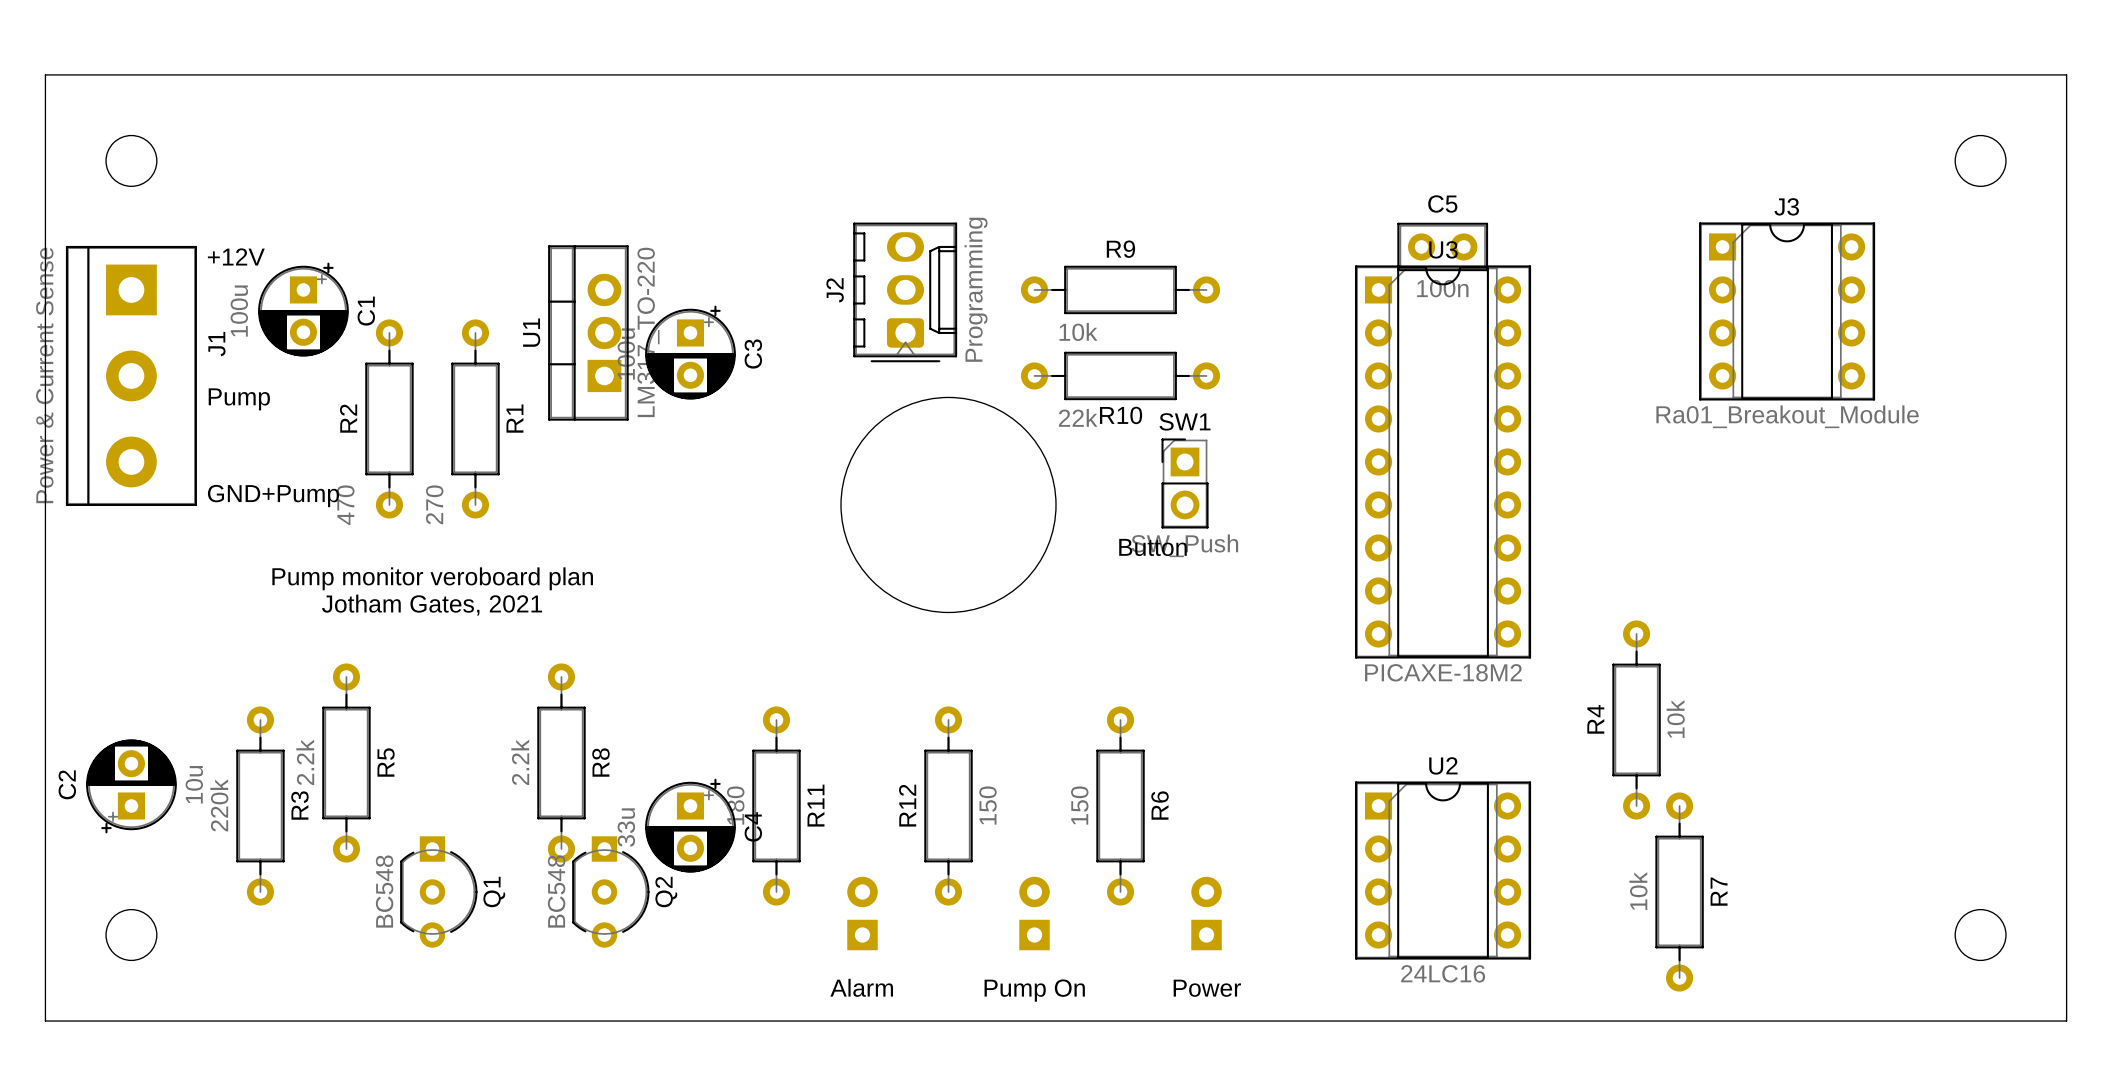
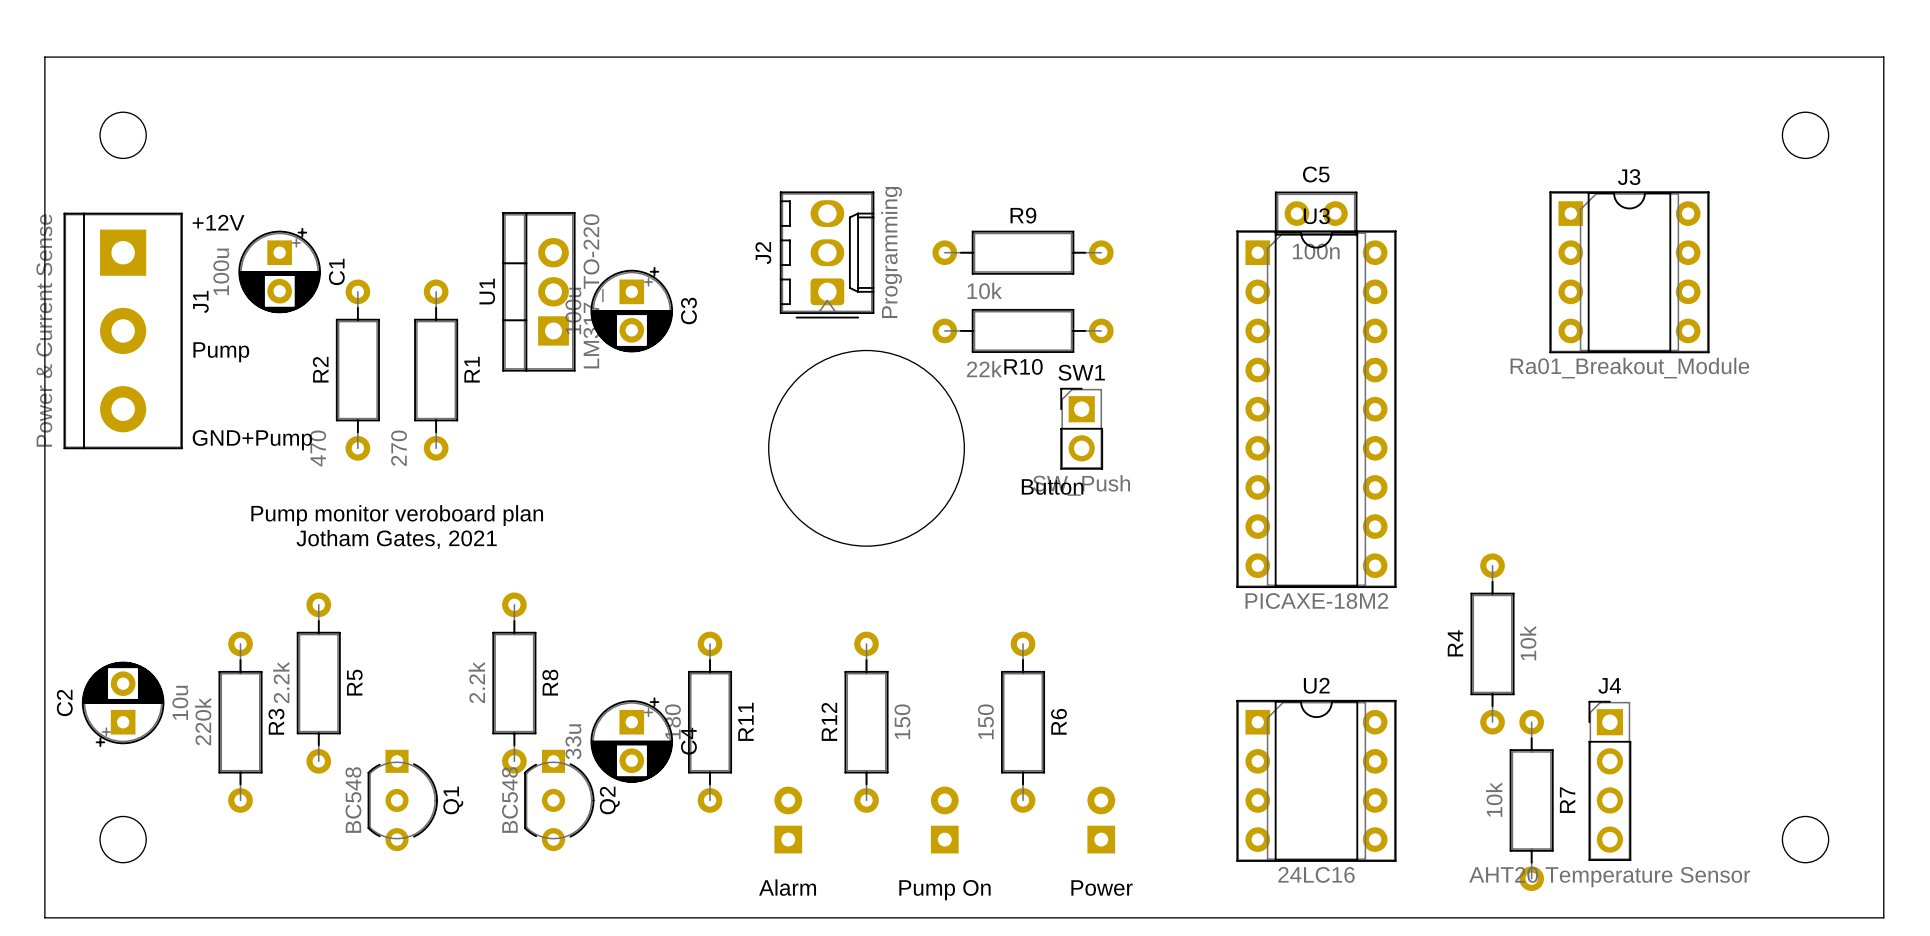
J4: none -> AHT20 Temperature Sensor (1609, 780)

